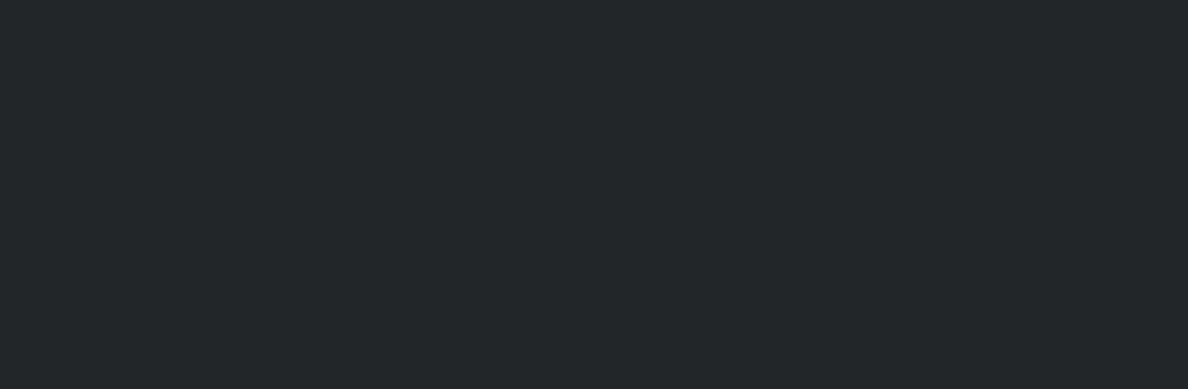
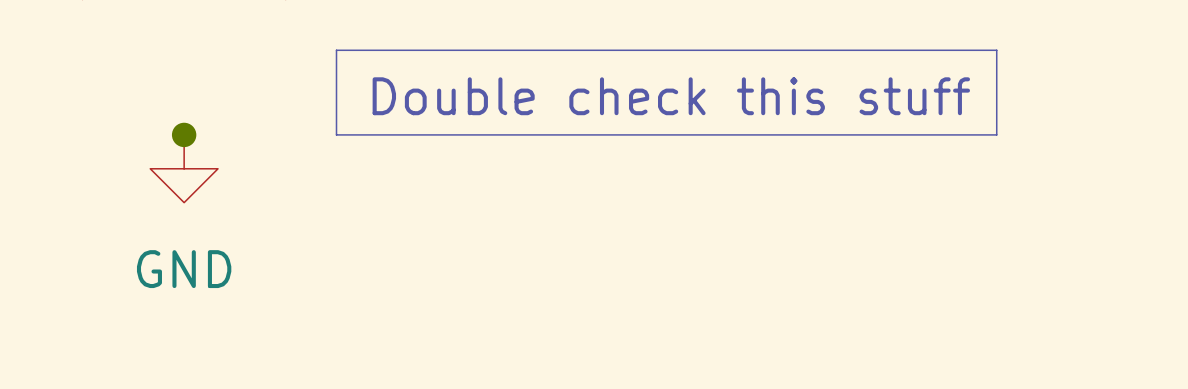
line: none -> (336, 50) (996, 50) (996, 134) (336, 134) (336, 50)
text: none -> Double check this stuff (671, 96)
junction: none -> (184, 134)
power symbol: none -> GND (184, 168)

